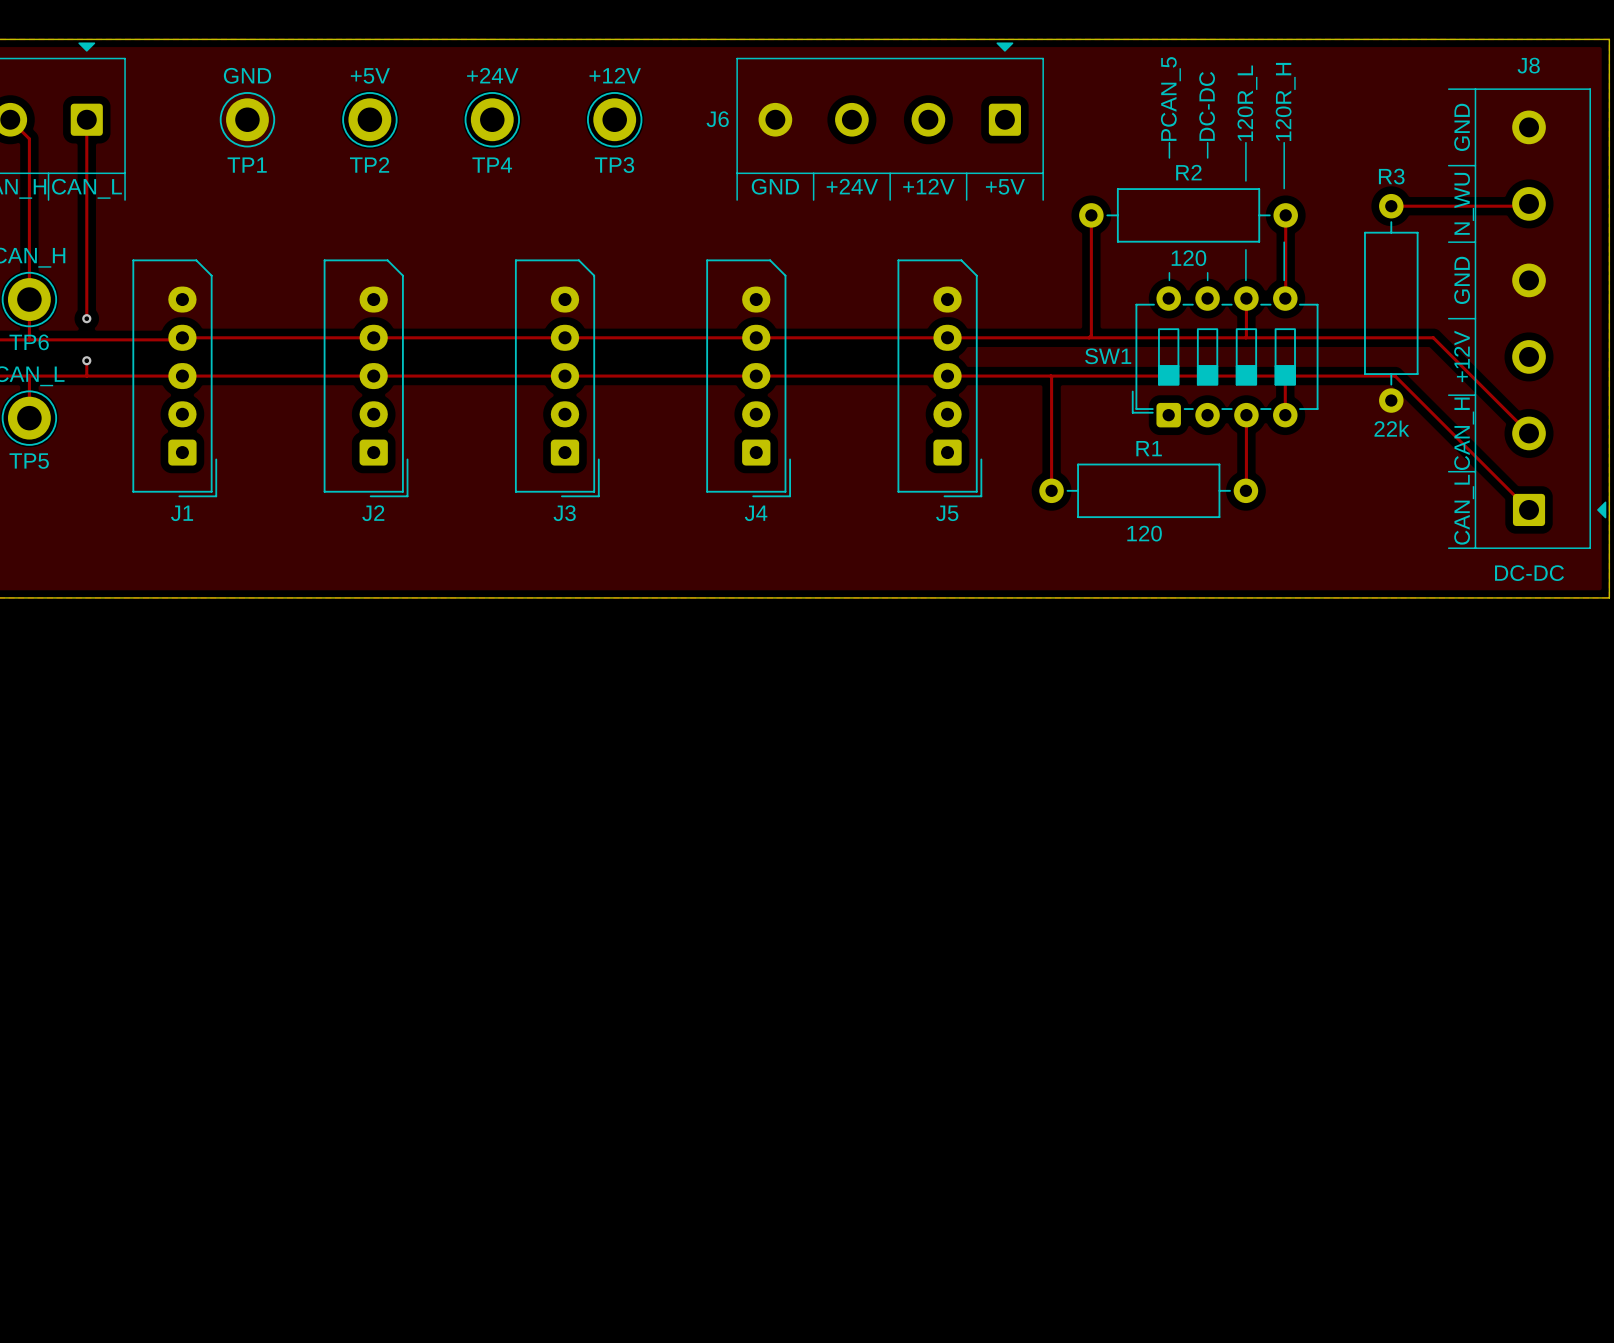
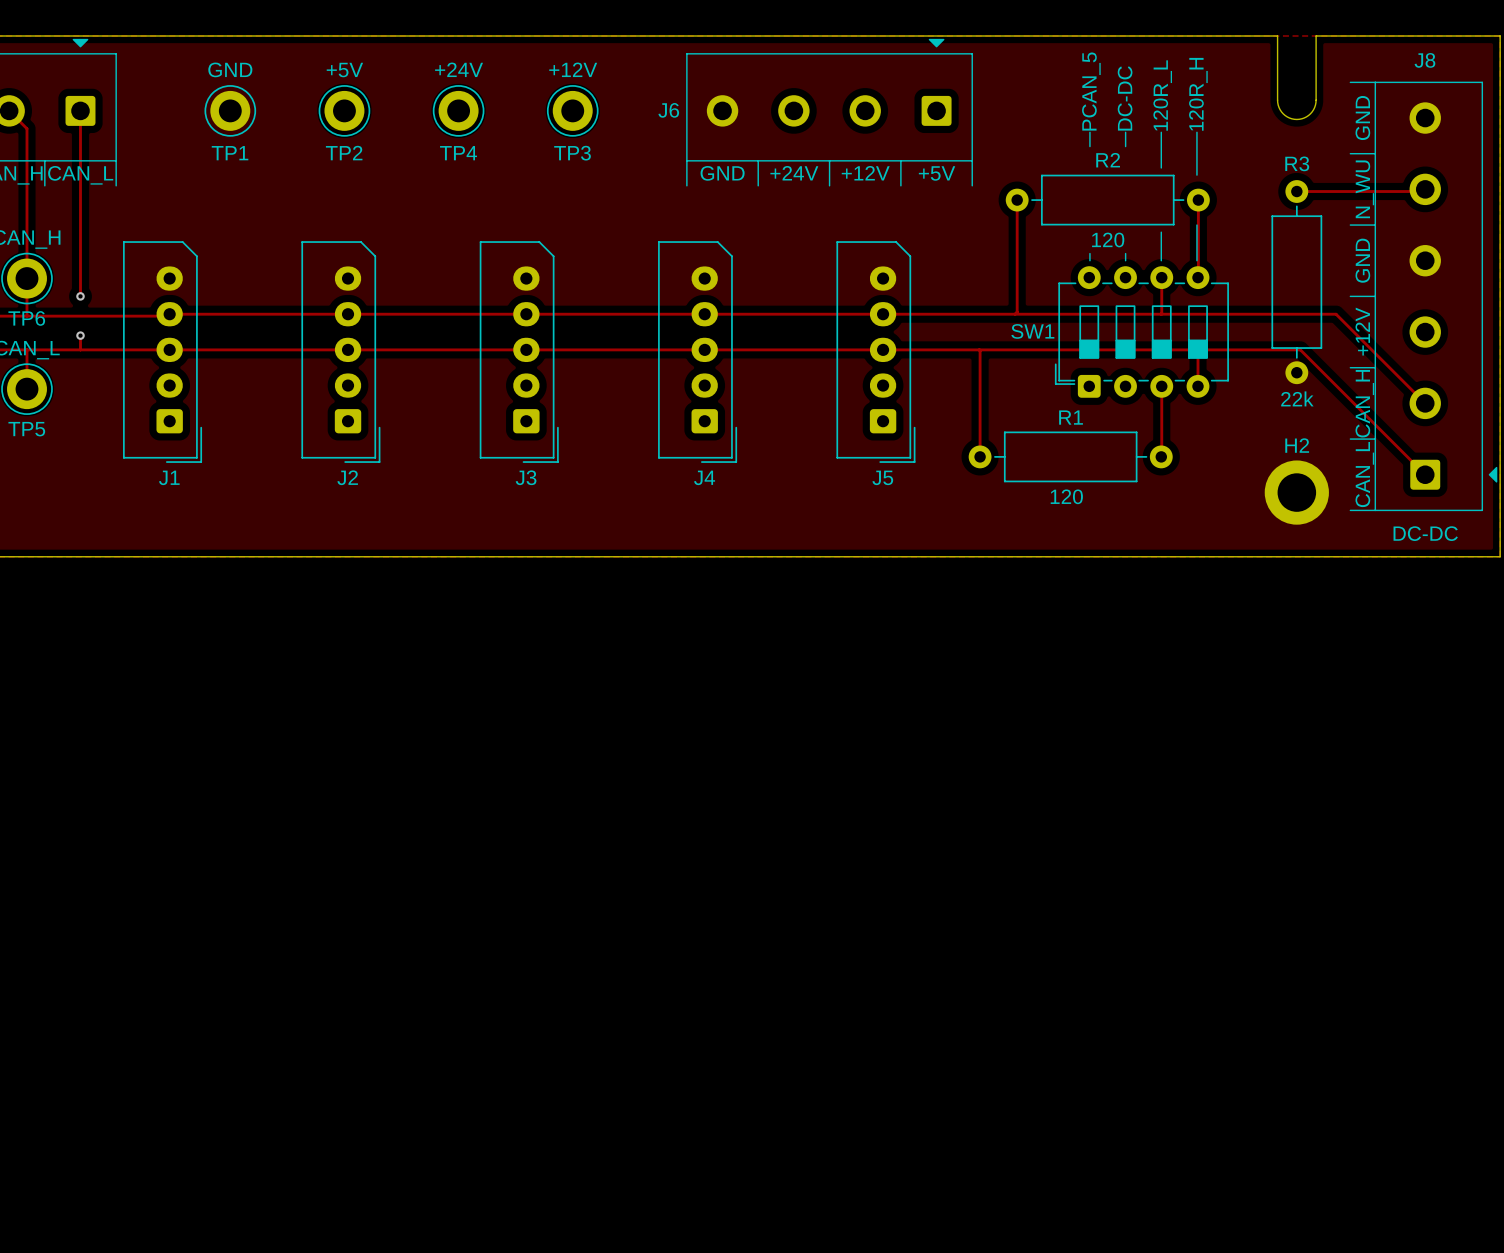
board edge: (1370, 39) (1411, 39) -> (1277, 35) (1278, 105) (1285, 115) (1296, 119) (1308, 115) (1315, 105) (1316, 35)
H2: none -> (1296, 492)

